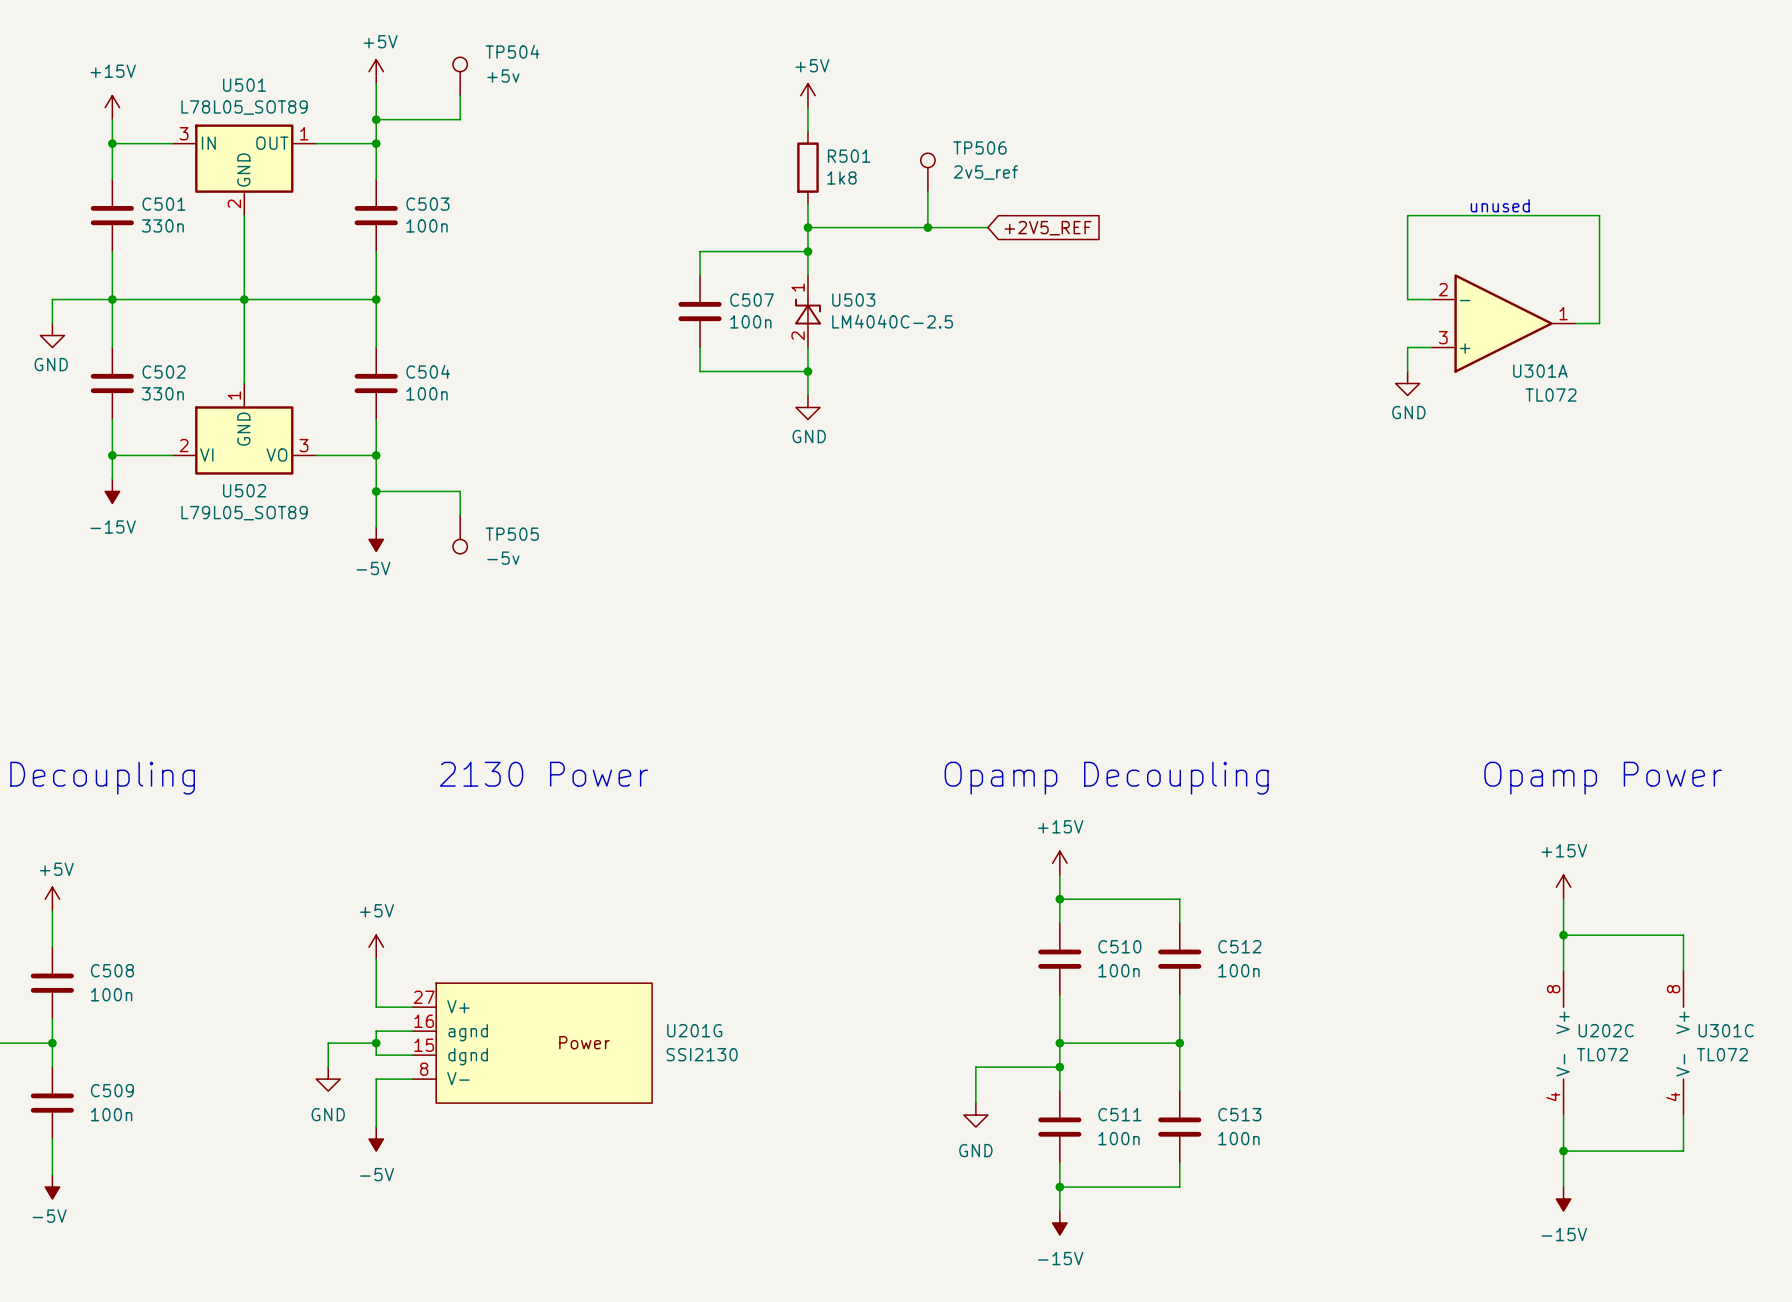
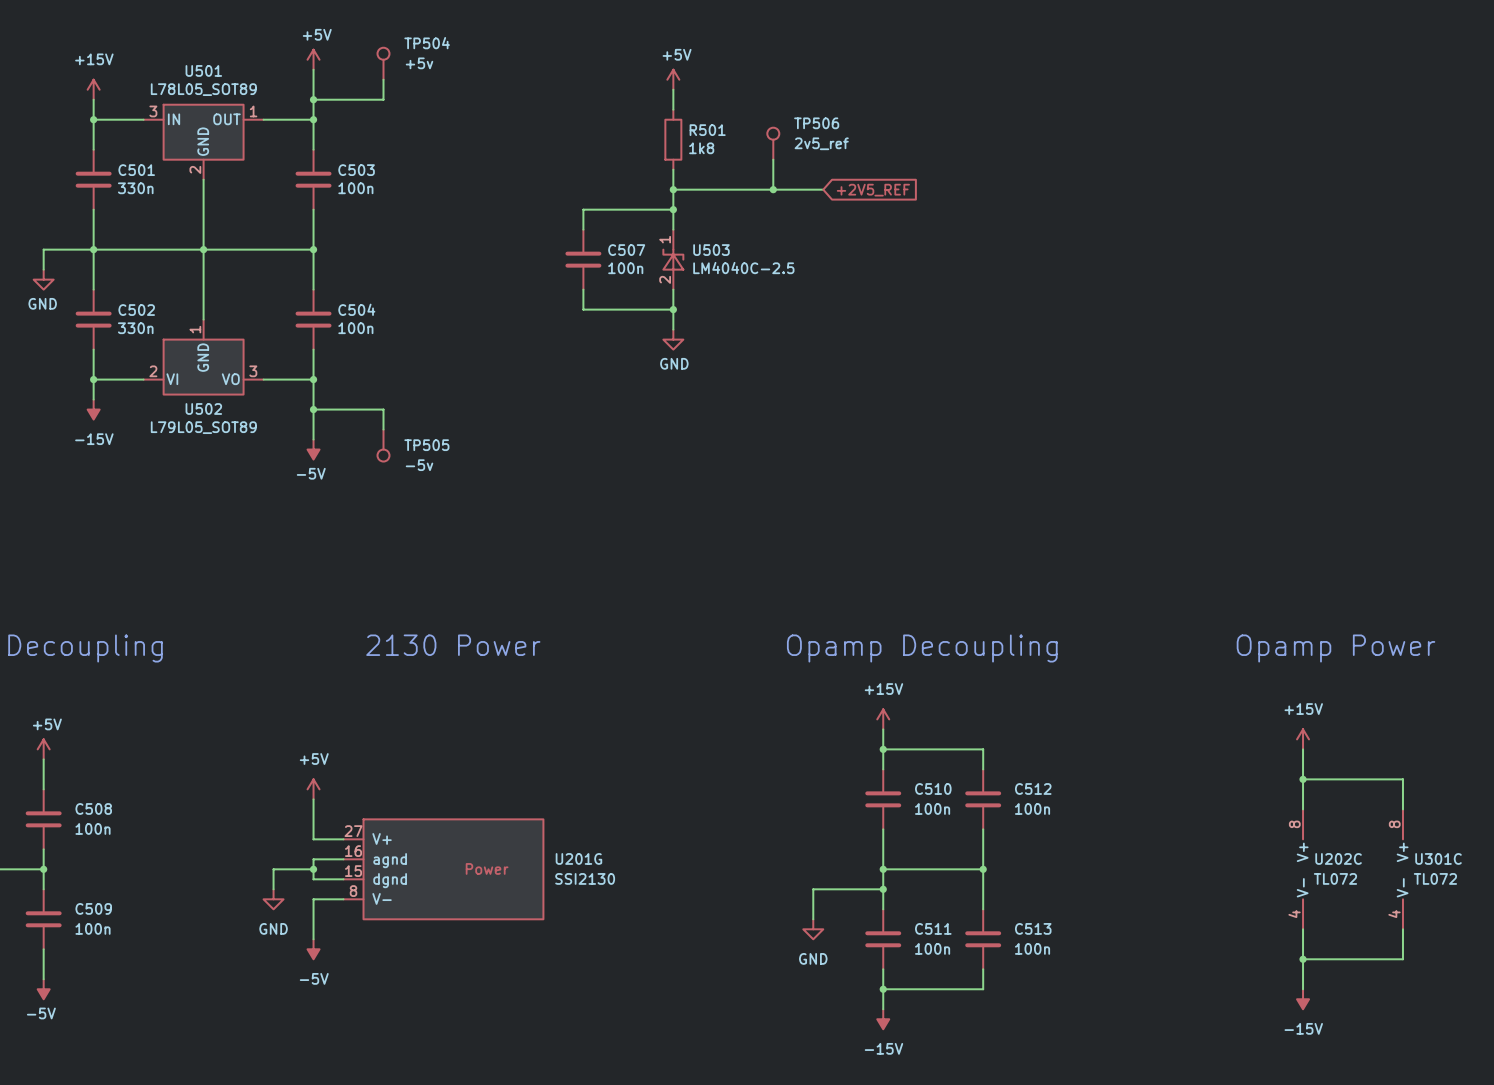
text: unused (1500, 205) -> none
wire: (1431, 299) (1407, 299) (1407, 215) (1599, 215) (1599, 323) (1575, 323) -> none
U301A: TL072 (1503, 323) -> none
wire: (1431, 347) (1407, 347) (1407, 371) -> none
power symbol: GND (1407, 383) -> none

